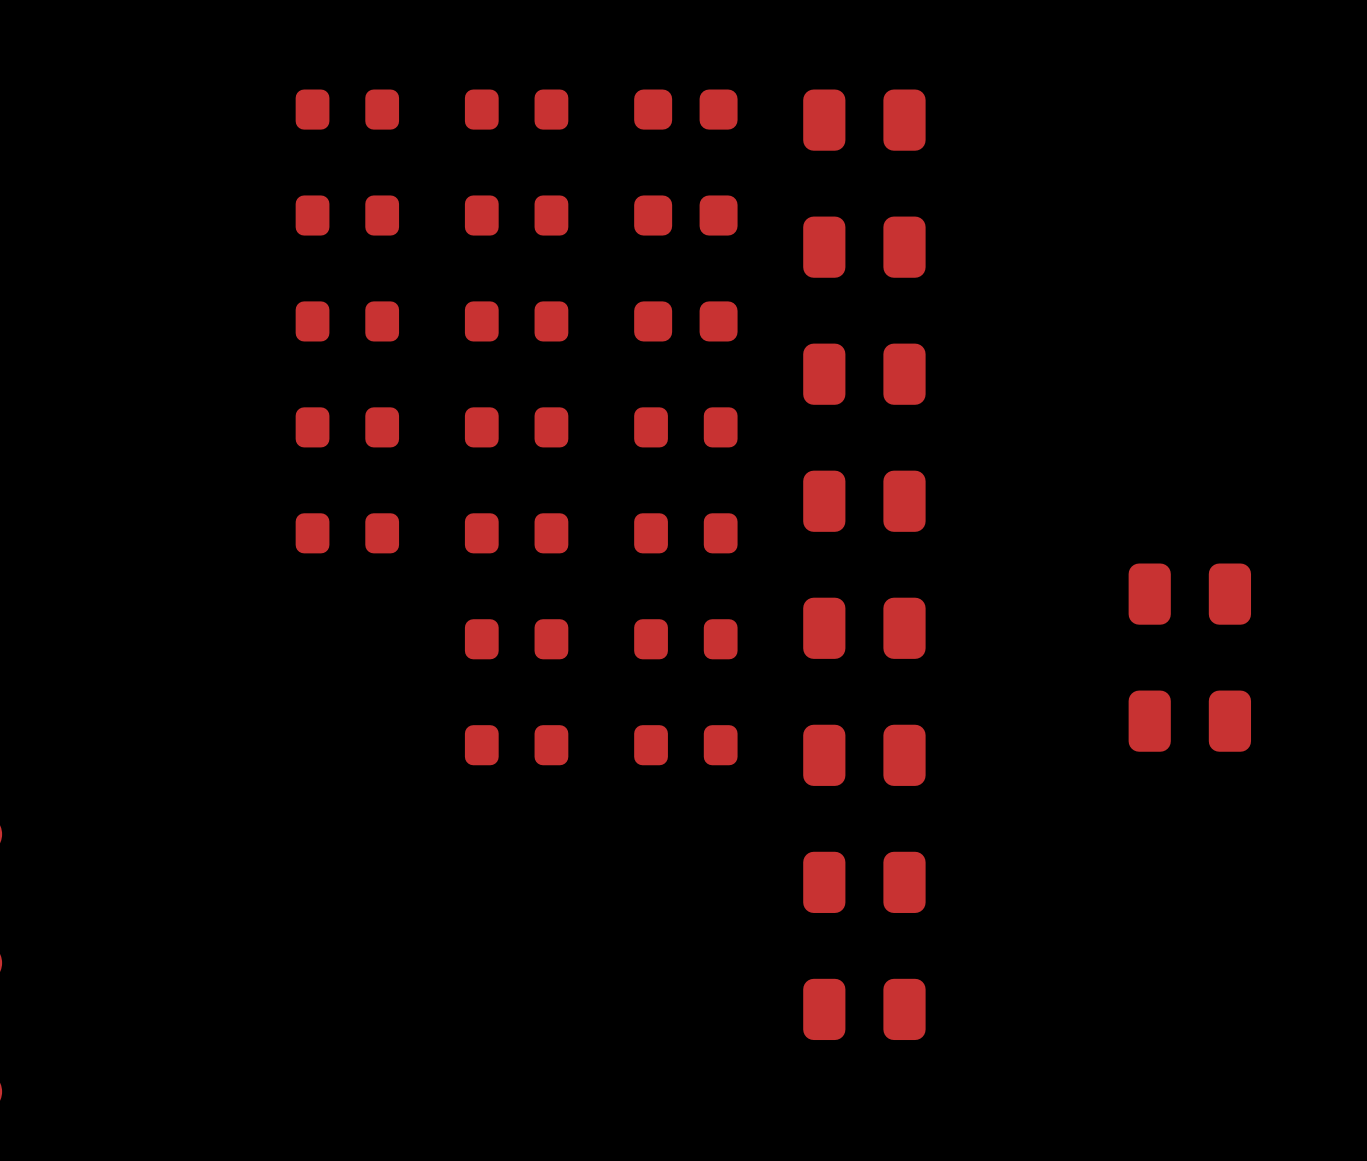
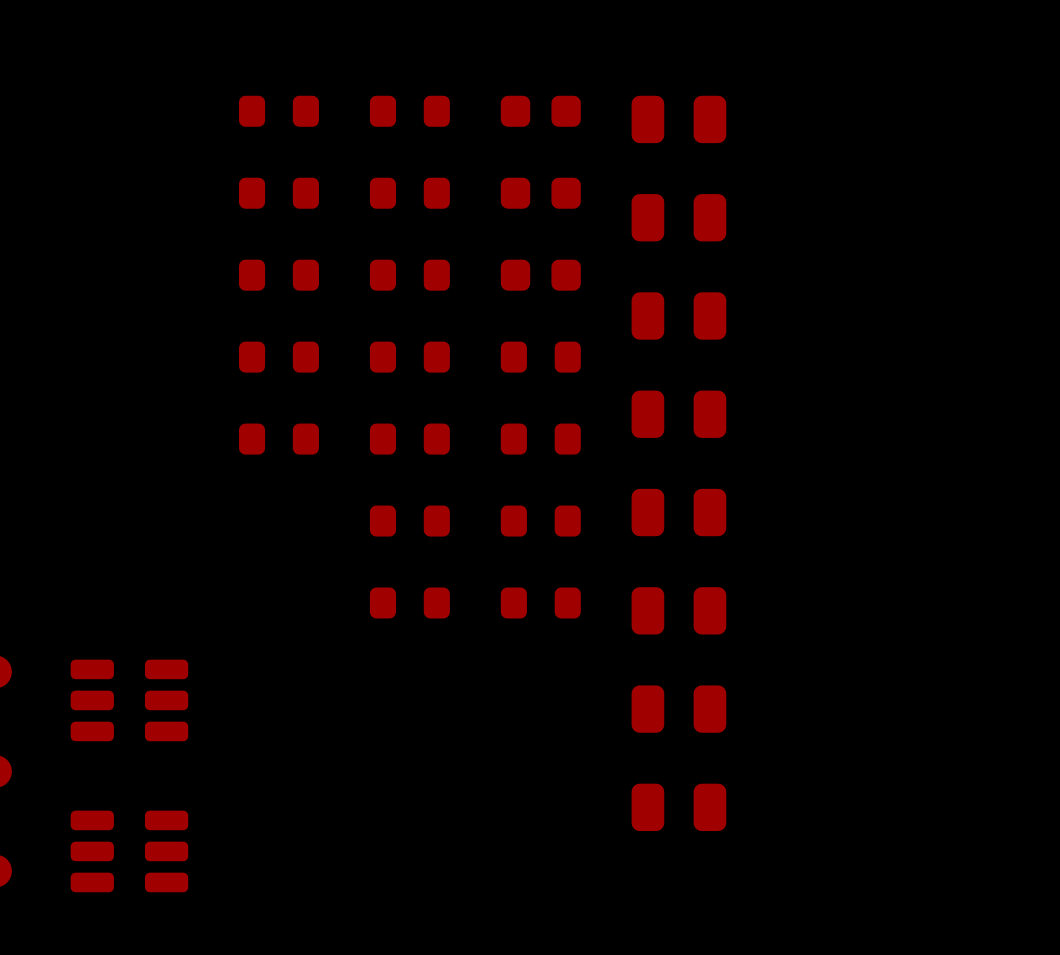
part: (1189, 594) -> none
part: (1189, 721) -> none
part: none -> (129, 700)
part: none -> (129, 851)

